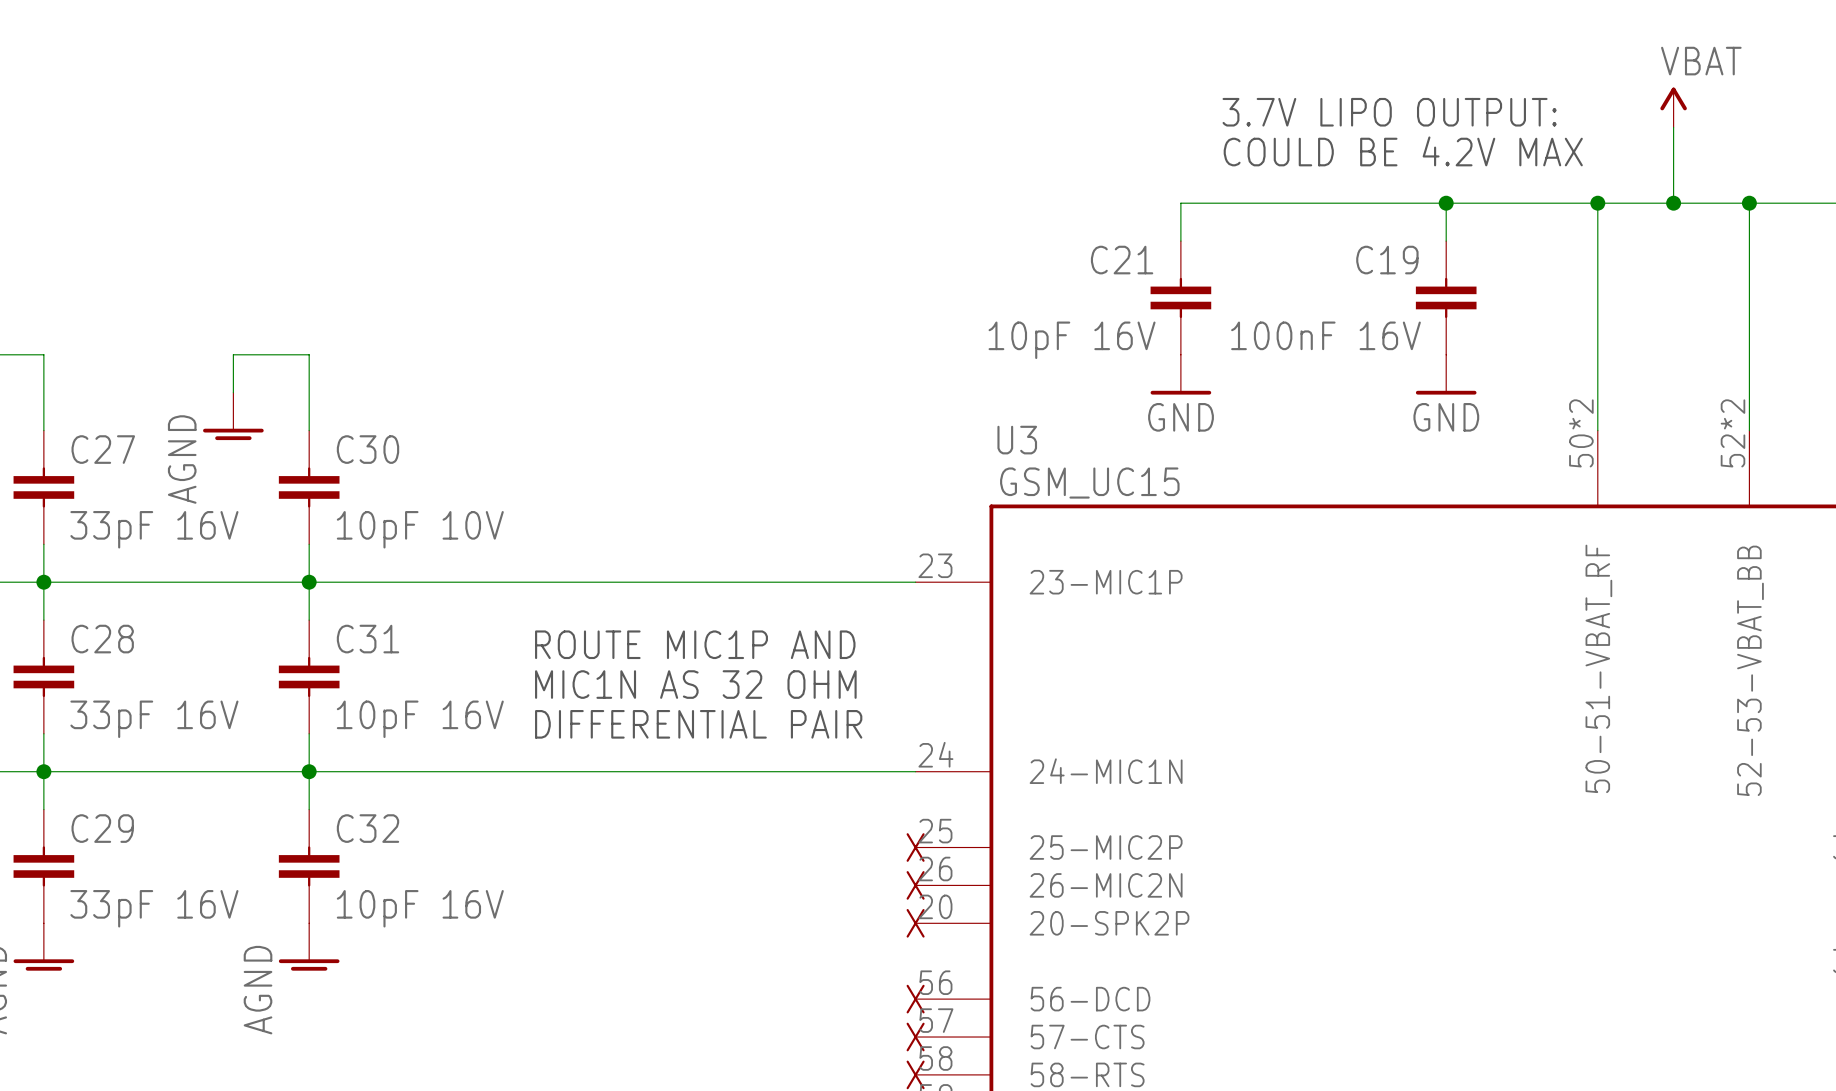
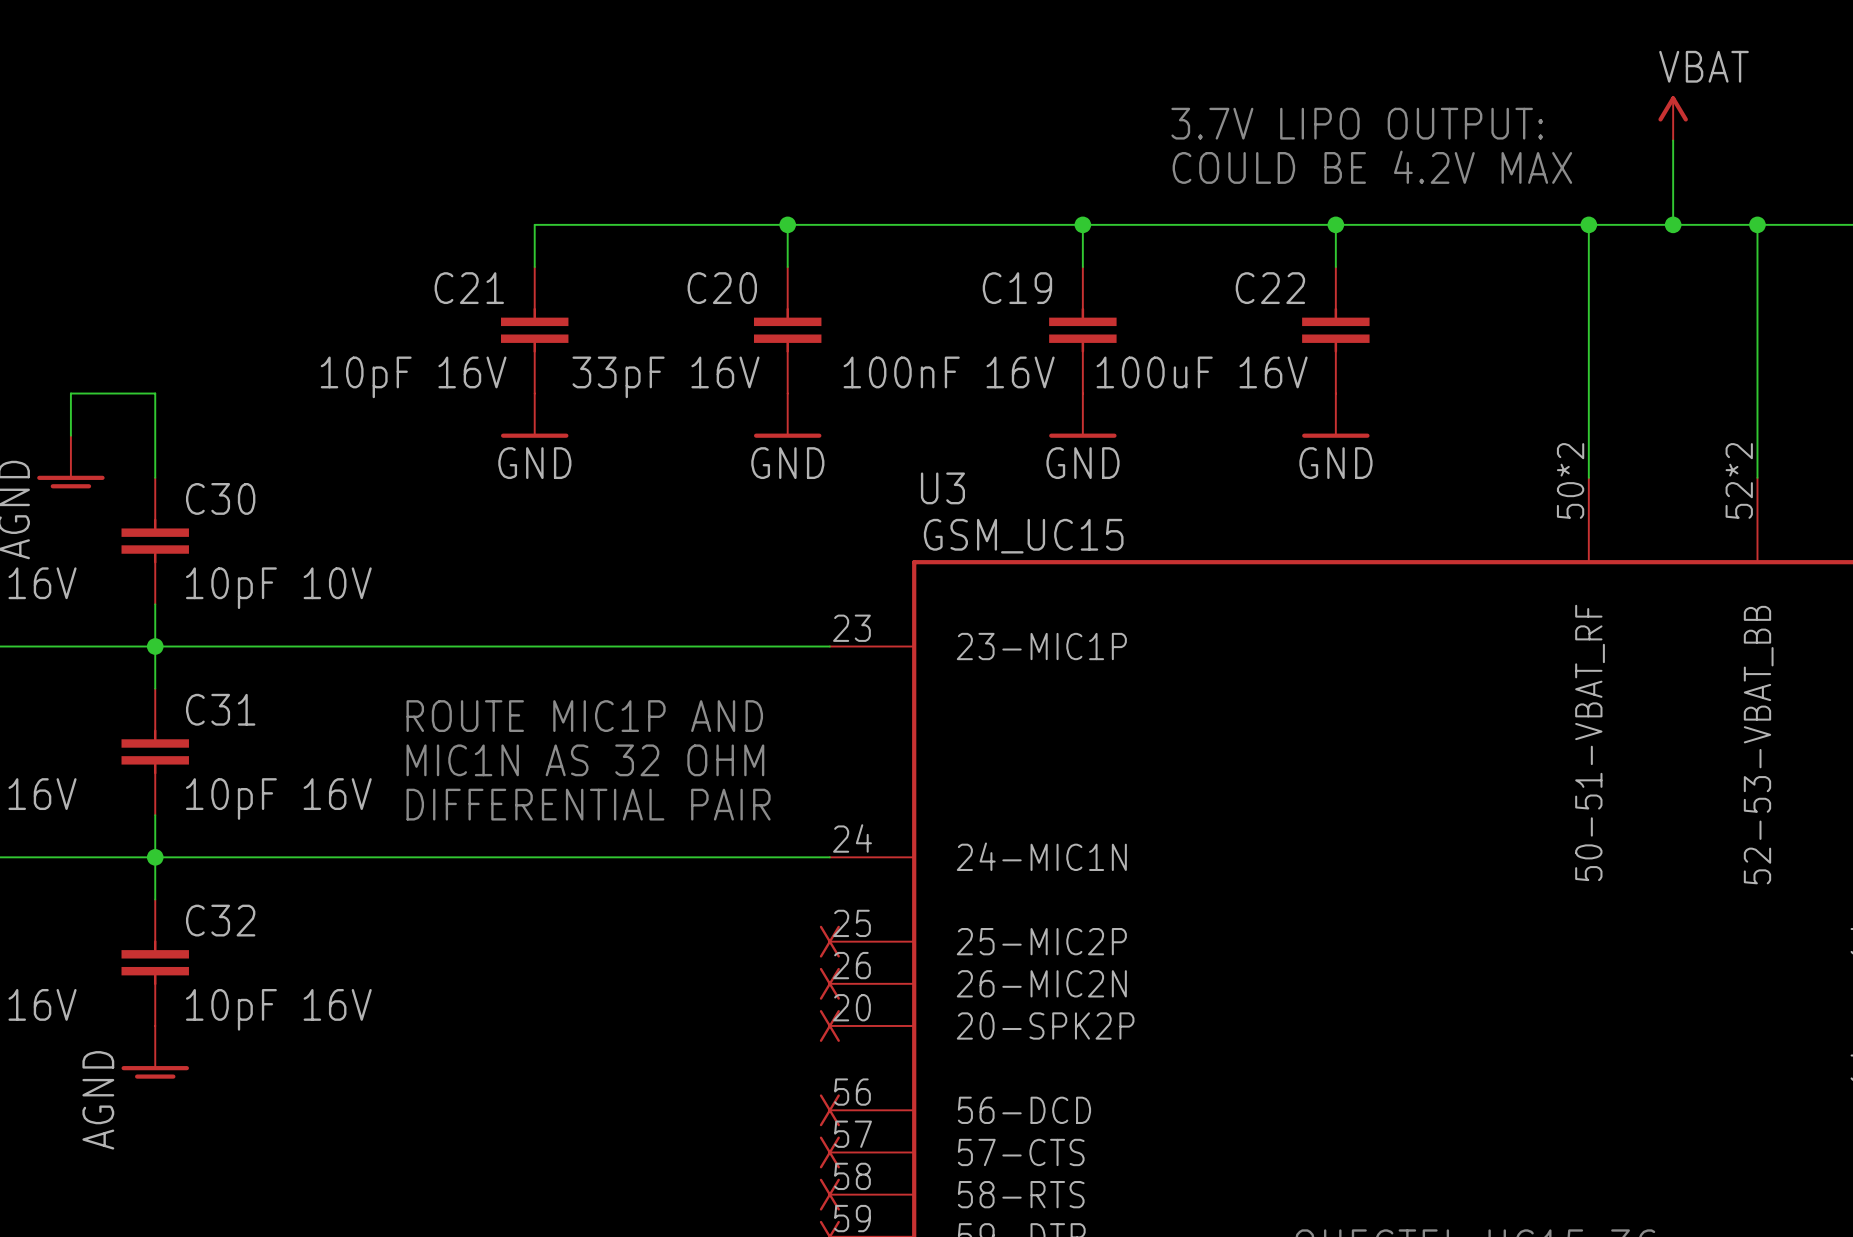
wire: none -> (787, 224) (787, 267)
junction: none -> (787, 224)
junction: none -> (1082, 224)
wire: (1180, 203) (1180, 241) -> (1125, 224) (534, 224) (534, 267)
wire: none -> (1335, 224) (1335, 267)
wire: (1446, 203) (1446, 241) -> (1082, 224) (1082, 267)
junction position: (1446, 203) -> (1335, 224)
C20: none -> 33pF 16V (787, 330)
C21 position: (1180, 297) -> (534, 330)
C22: none -> 100uF 16V (1335, 330)
C19 position: (1446, 297) -> (1082, 330)
power symbol: none -> GND (534, 415)
power symbol: none -> GND (787, 415)
power symbol position: GND (1180, 374) -> GND (1082, 415)
power symbol position: GND (1446, 374) -> GND (1335, 415)

